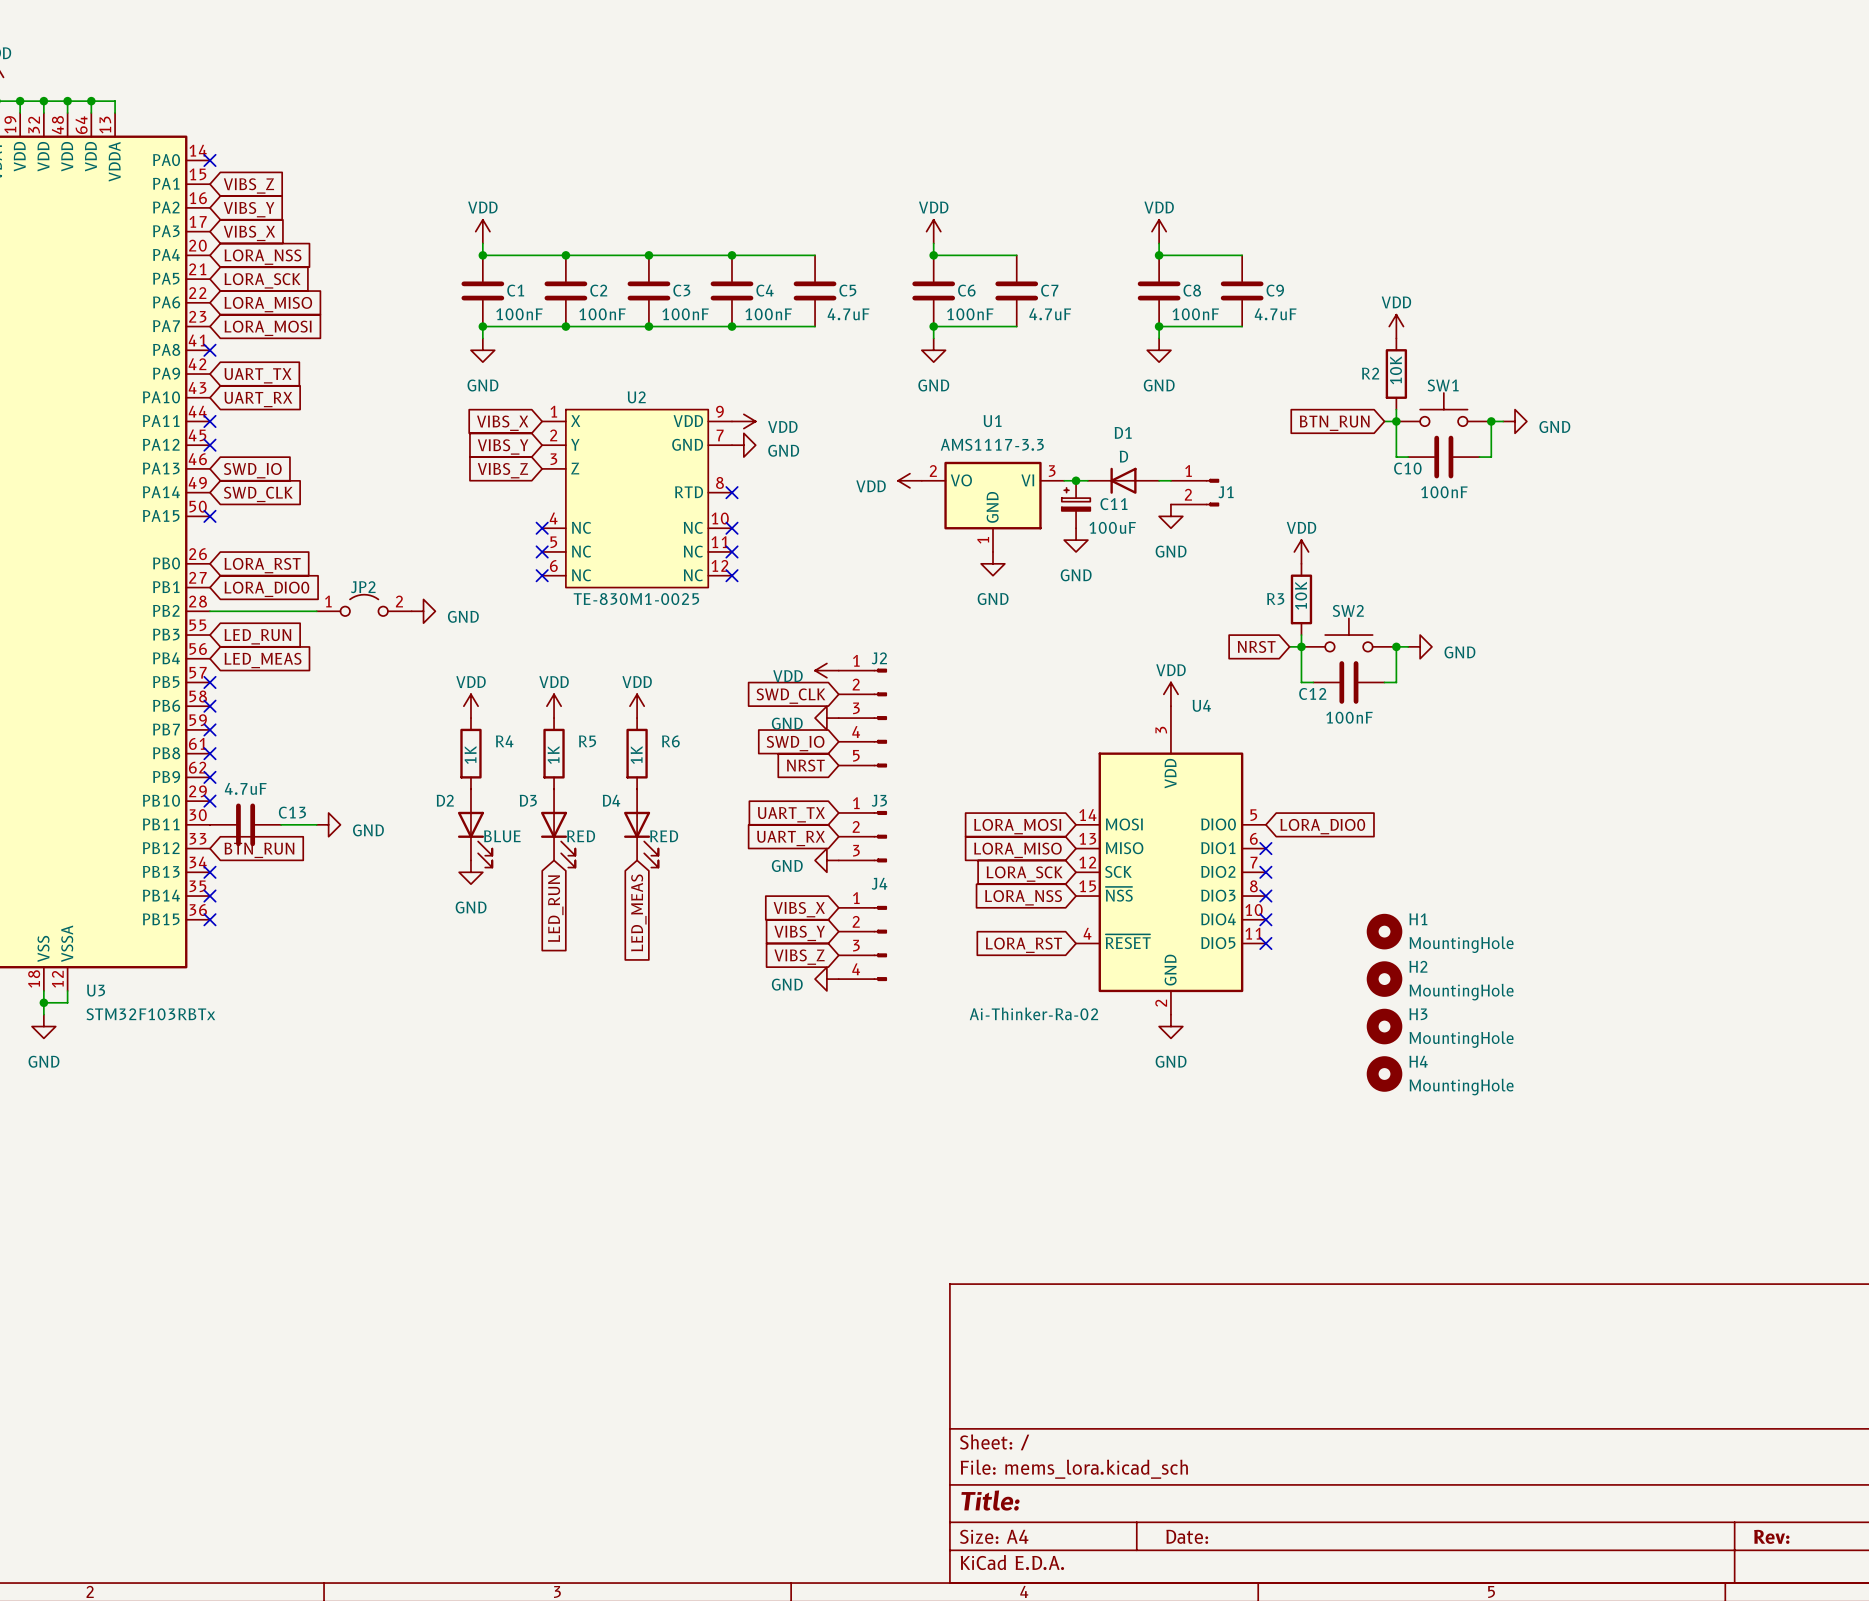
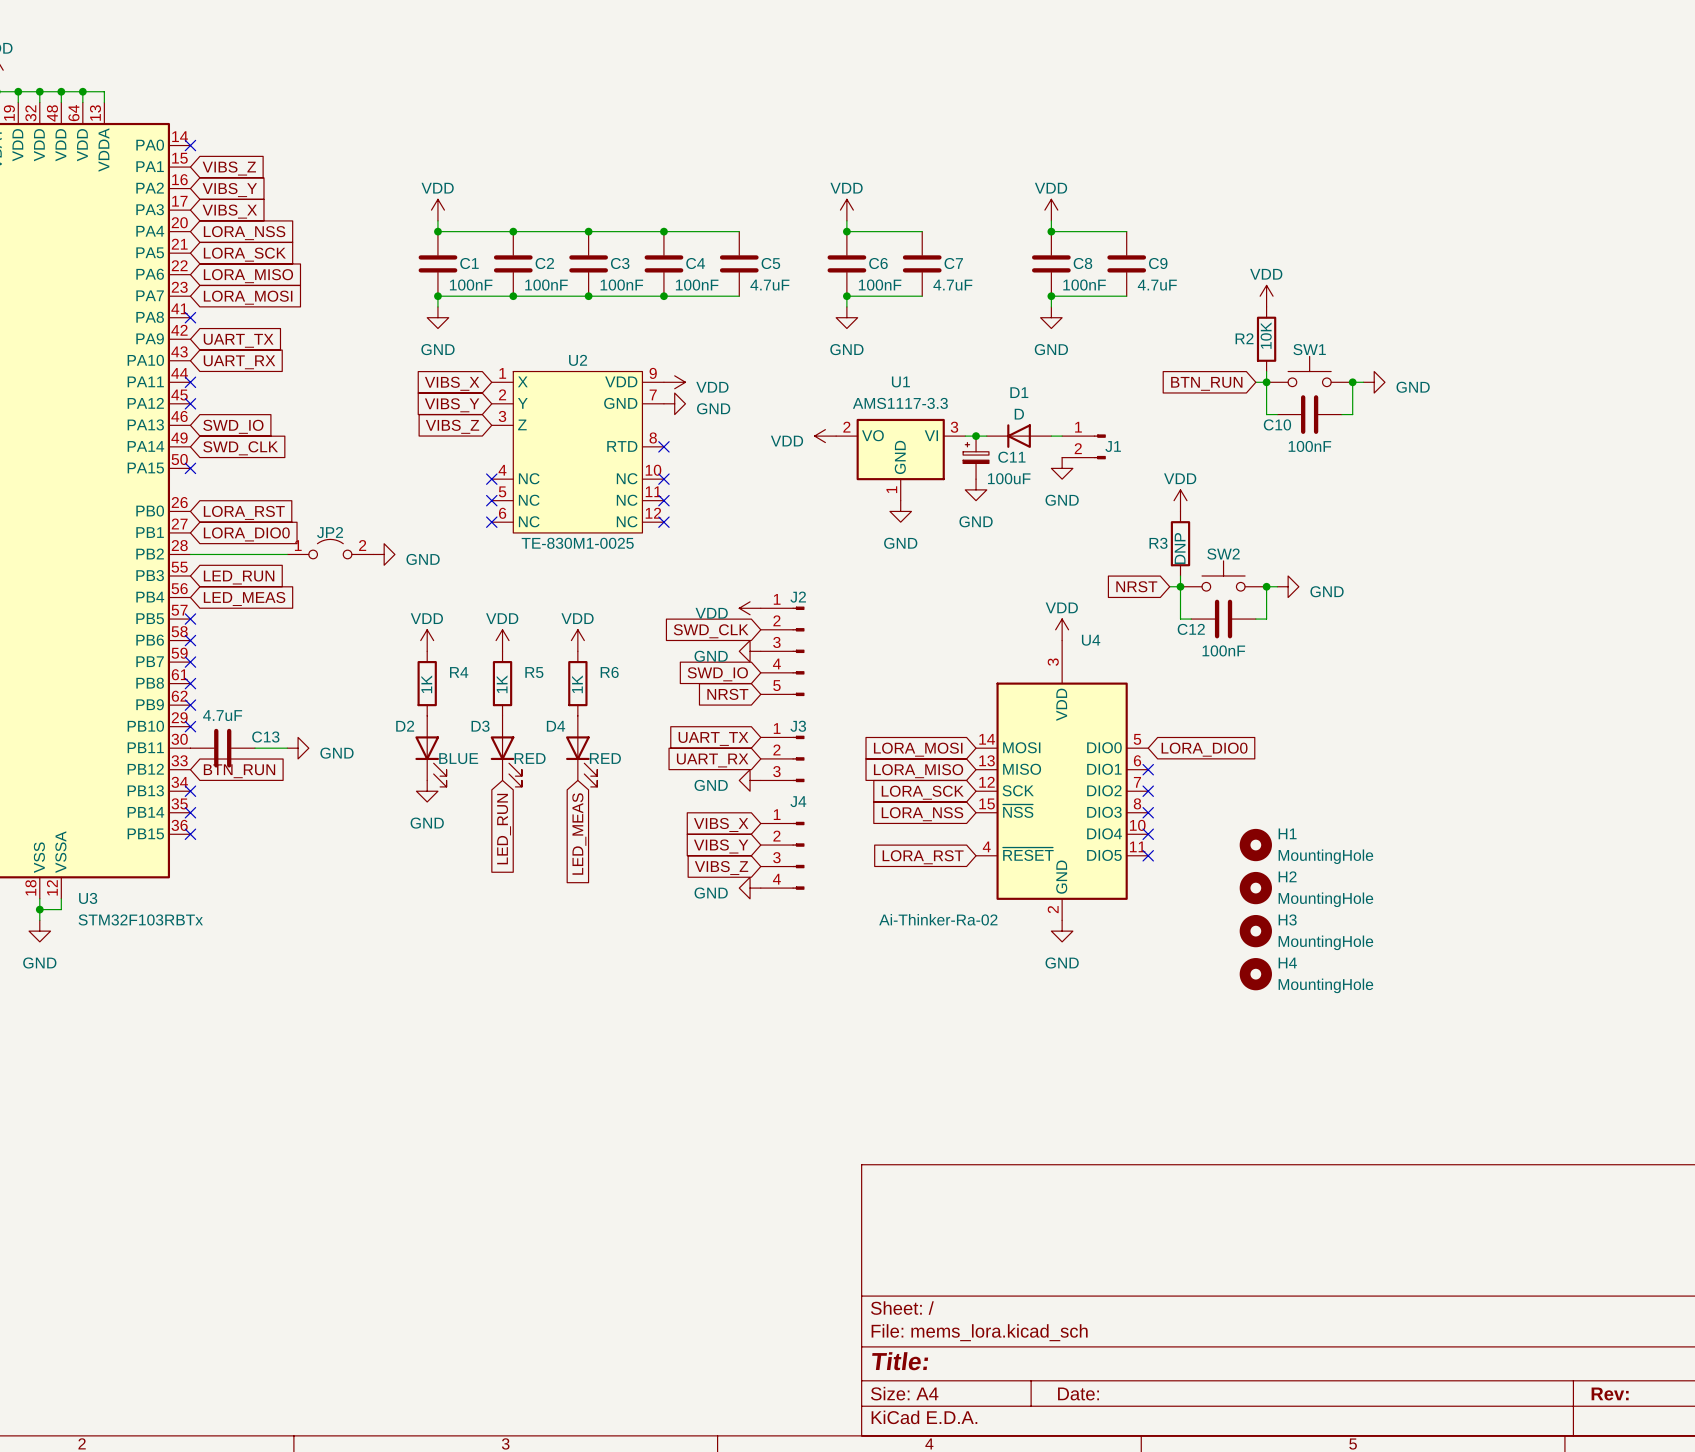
R3 value: 10K (1301, 595) -> DNP (1180, 548)

